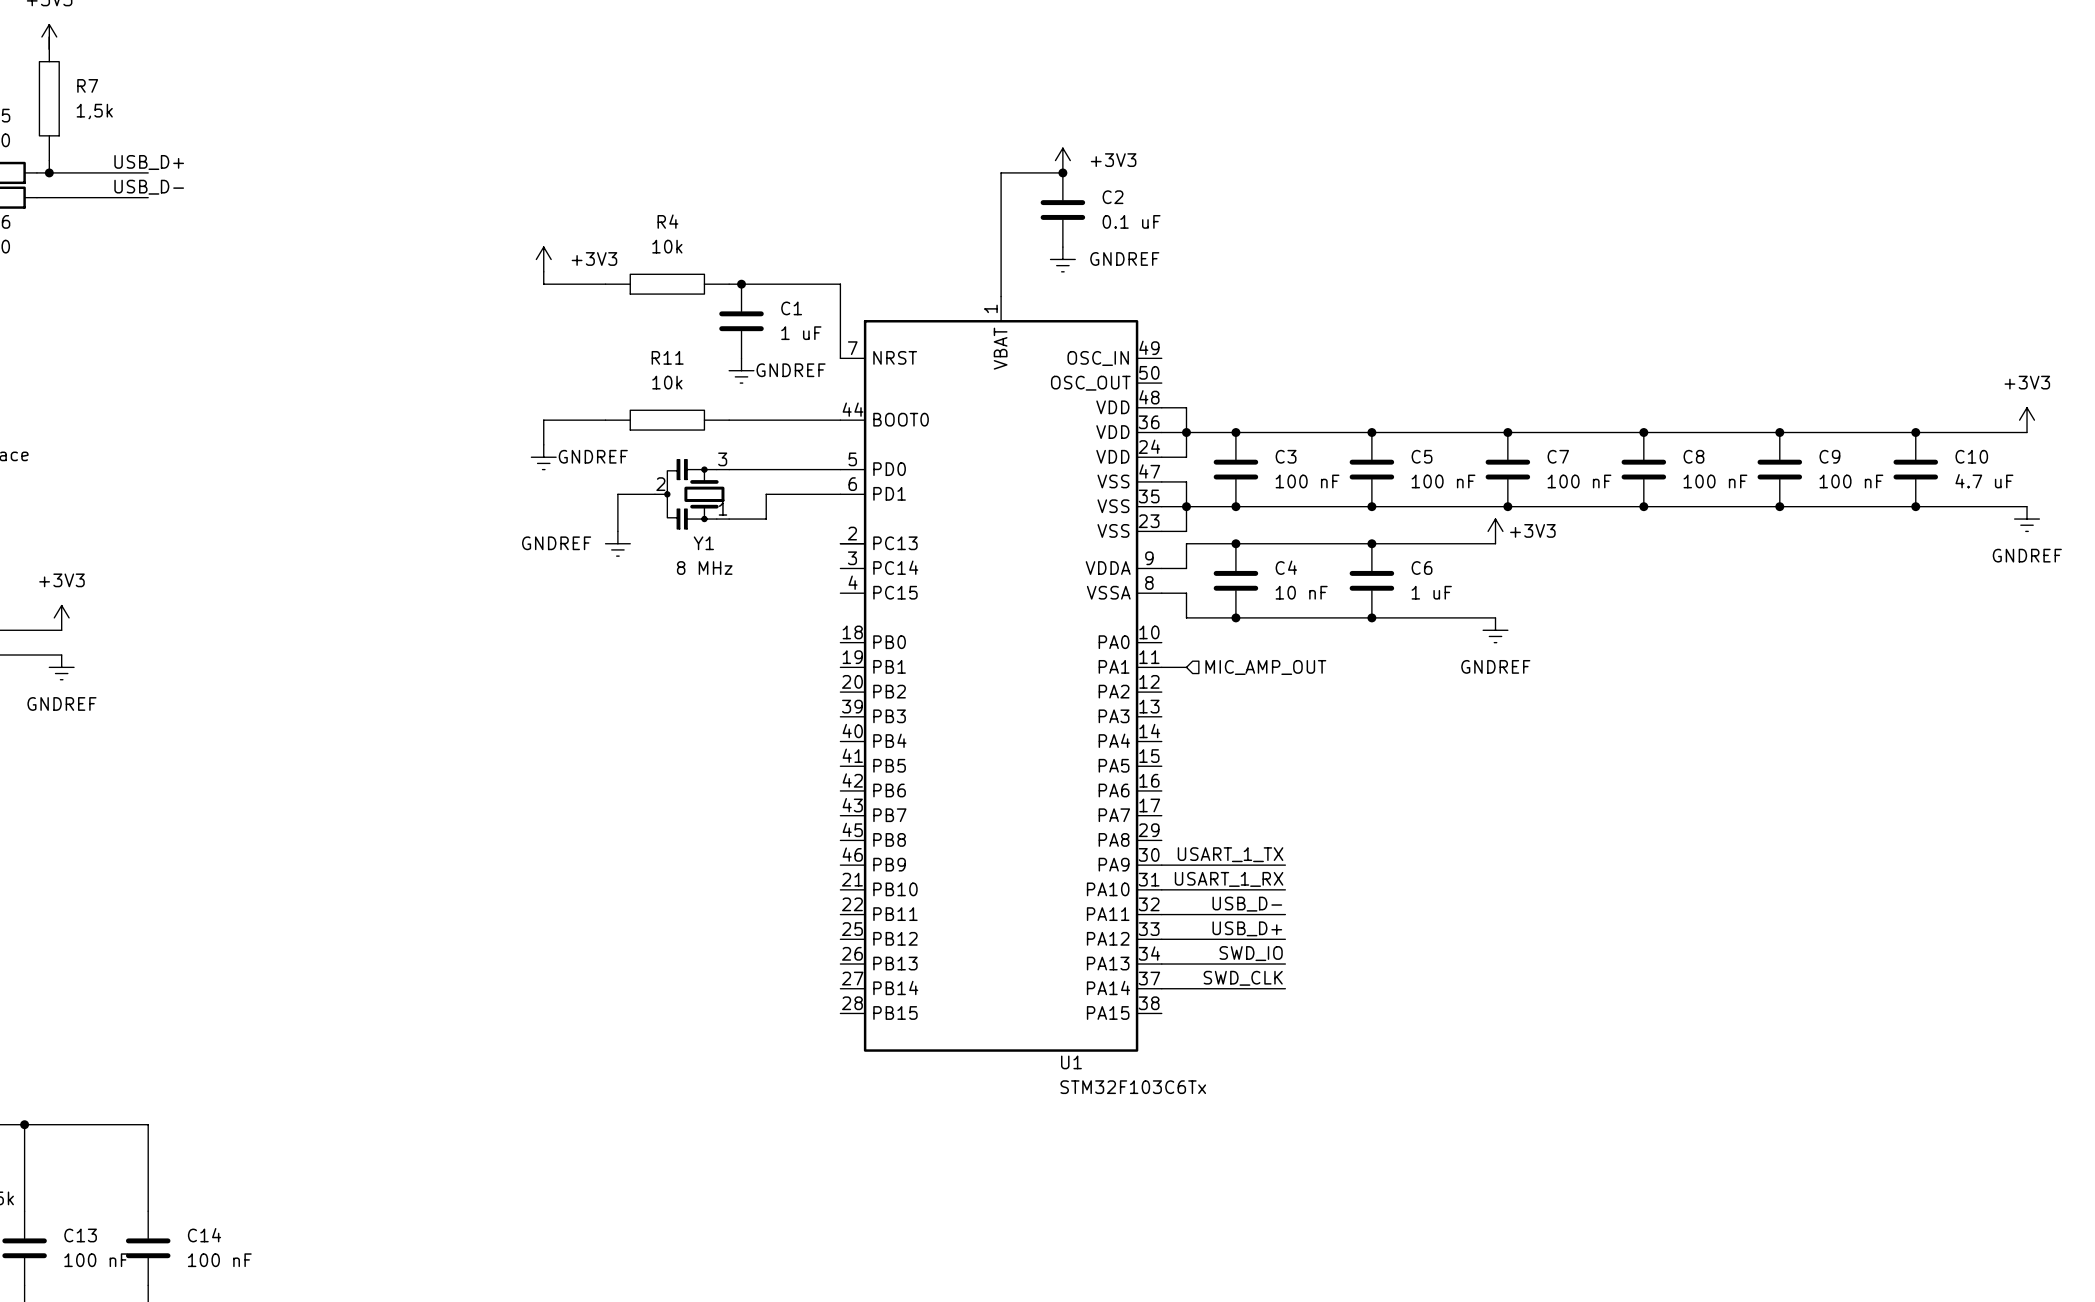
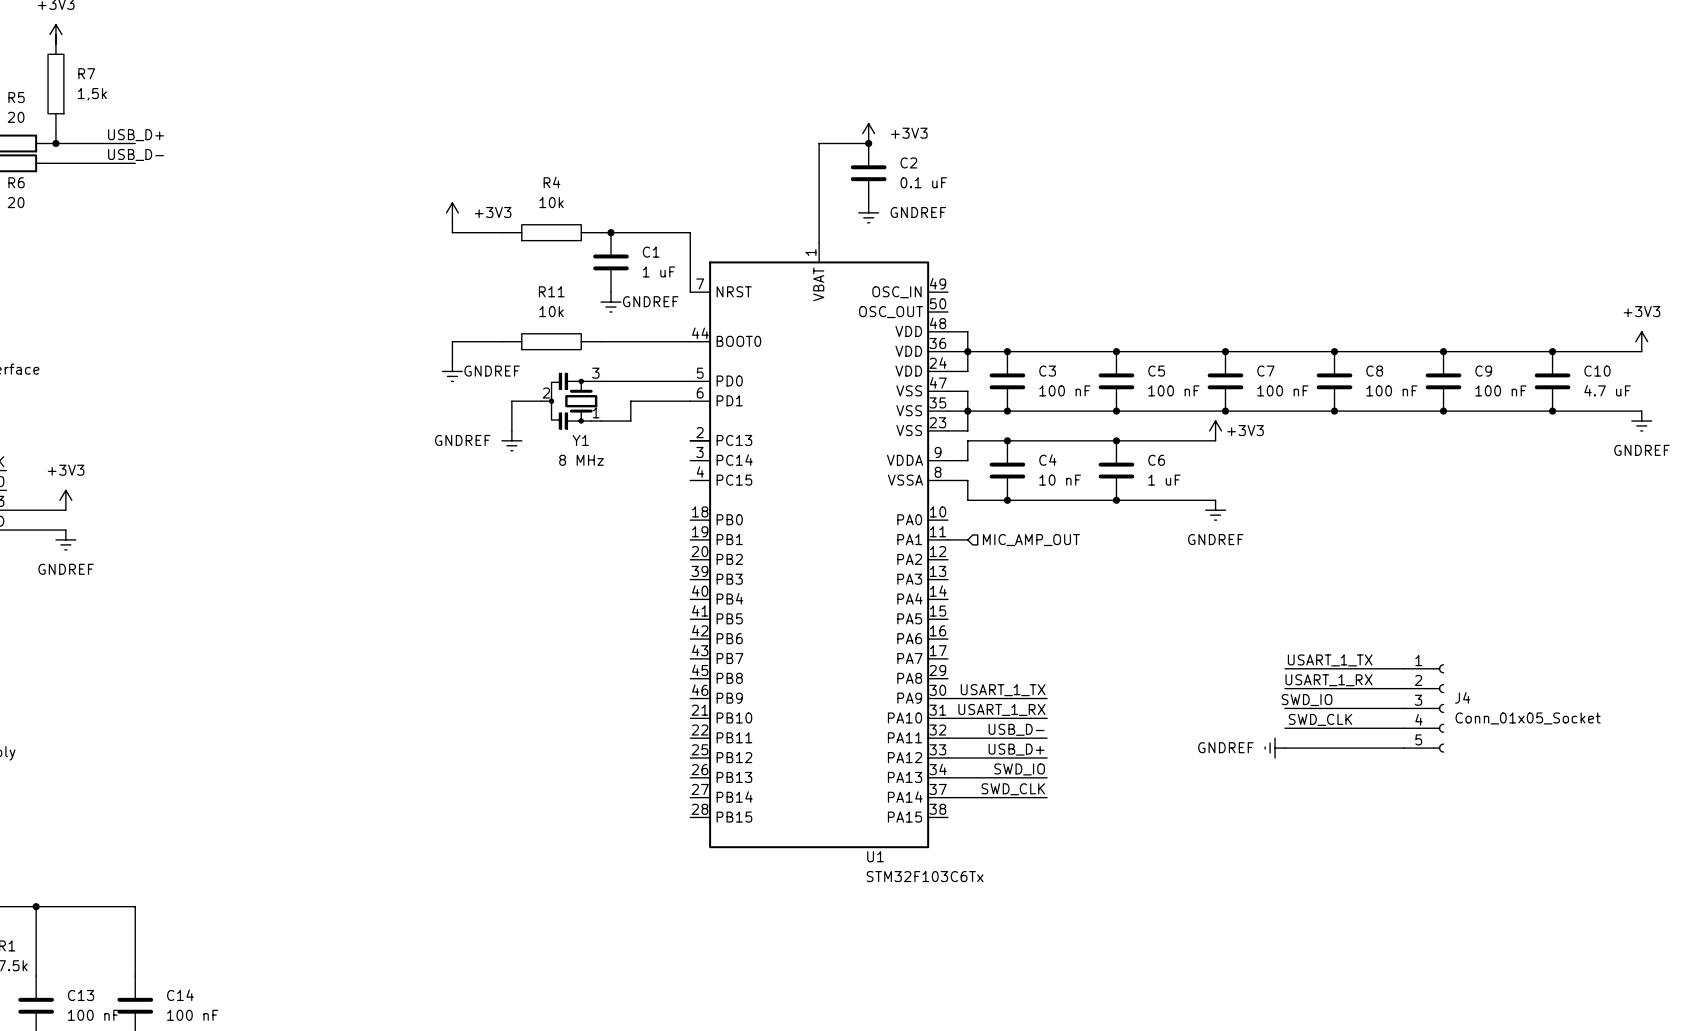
label: none -> USART_1_TX (1330, 660)
wire: none -> (1284, 668) (1403, 668)
label: none -> USART_1_RX (1329, 680)
wire: none -> (1284, 688) (1403, 688)
label: none -> SWD_IO (1307, 700)
wire: none -> (1284, 708) (1403, 708)
J4: none -> Conn_01x05_Socket (1424, 708)
label: none -> SWD_CLK (1320, 719)
wire: none -> (1284, 728) (1403, 728)
power symbol: none -> GNDREF (1275, 748)
wire: none -> (1284, 748) (1403, 748)

